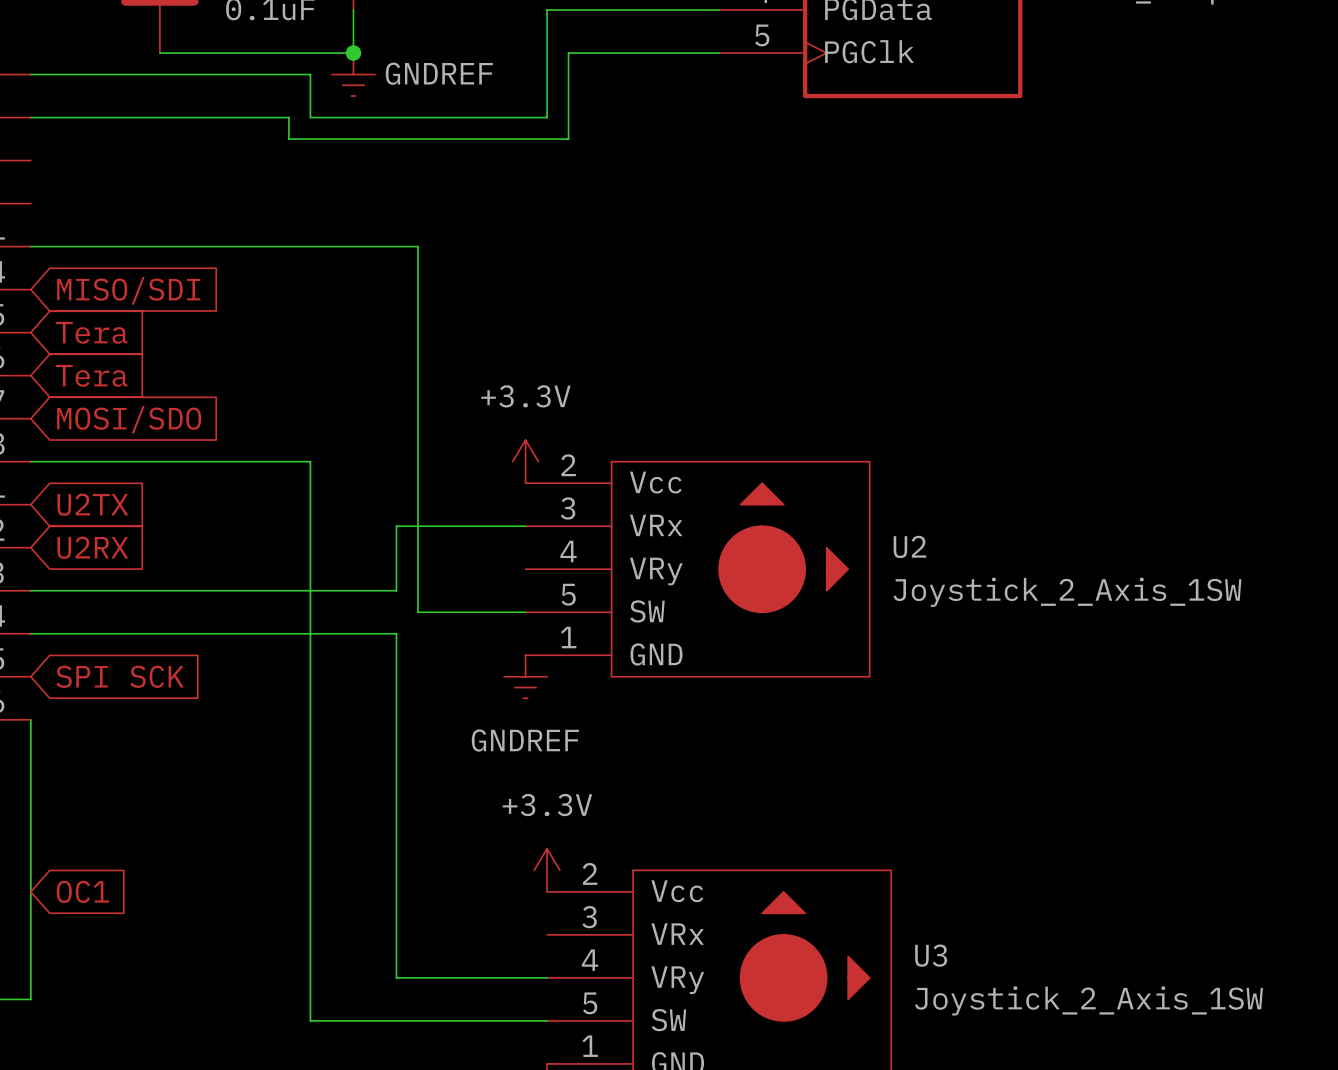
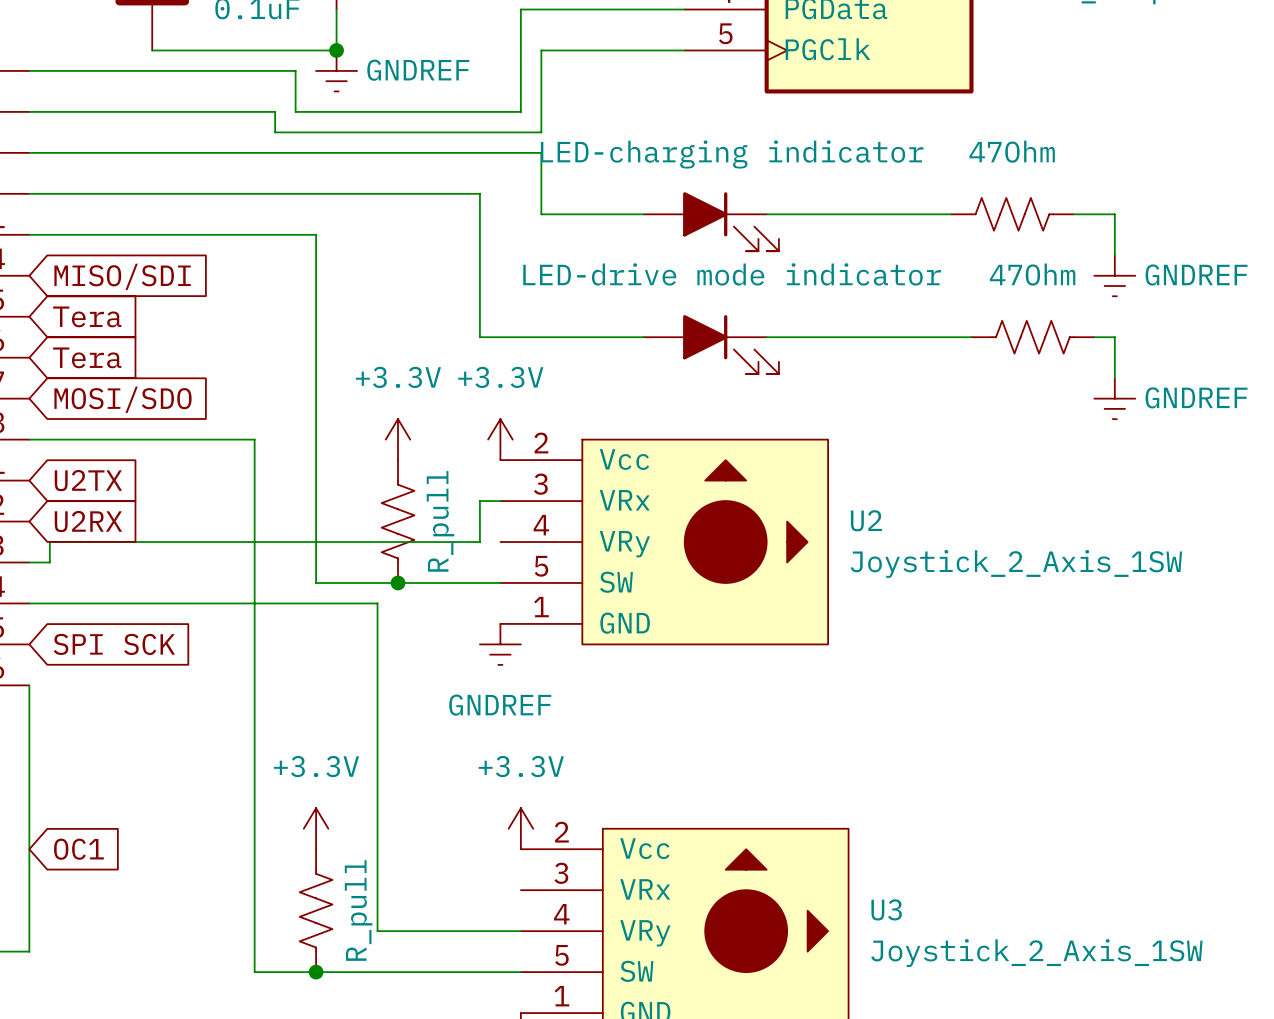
wire: none -> (29, 152) (541, 152) (541, 214) (643, 214)
wire: none -> (29, 193) (479, 193) (479, 337) (643, 337)
wire: none -> (766, 214) (950, 214)
part: none -> 47Ohm (1012, 214)
wire: none -> (1073, 214) (1114, 214) (1114, 255)
part: none -> LED-charging indicator (711, 221)
wire: (331, 246) (418, 246) (418, 612) -> (316, 234) (316, 582) (398, 582)
power symbol: none -> GNDREF (1114, 275)
wire: none -> (766, 337) (971, 337)
part: none -> 47Ohm (1032, 337)
wire: none -> (1094, 337) (1114, 337) (1114, 378)
part: none -> LED-drive mode indicator (711, 344)
power symbol: none -> GNDREF (1114, 398)
wire: (267, 461) (310, 461) (310, 1020) -> (254, 439) (254, 972) (295, 972)
power symbol: none -> +3.3V (398, 439)
wire: (504, 526) (396, 526) (396, 590) (52, 590) -> (479, 501) (479, 542) (49, 542) (49, 562)
part: none -> R_pull (398, 521)
junction: none -> (398, 582)
power symbol: none -> +3.3V (316, 828)
part: none -> R_pull (316, 910)
junction: none -> (316, 972)

